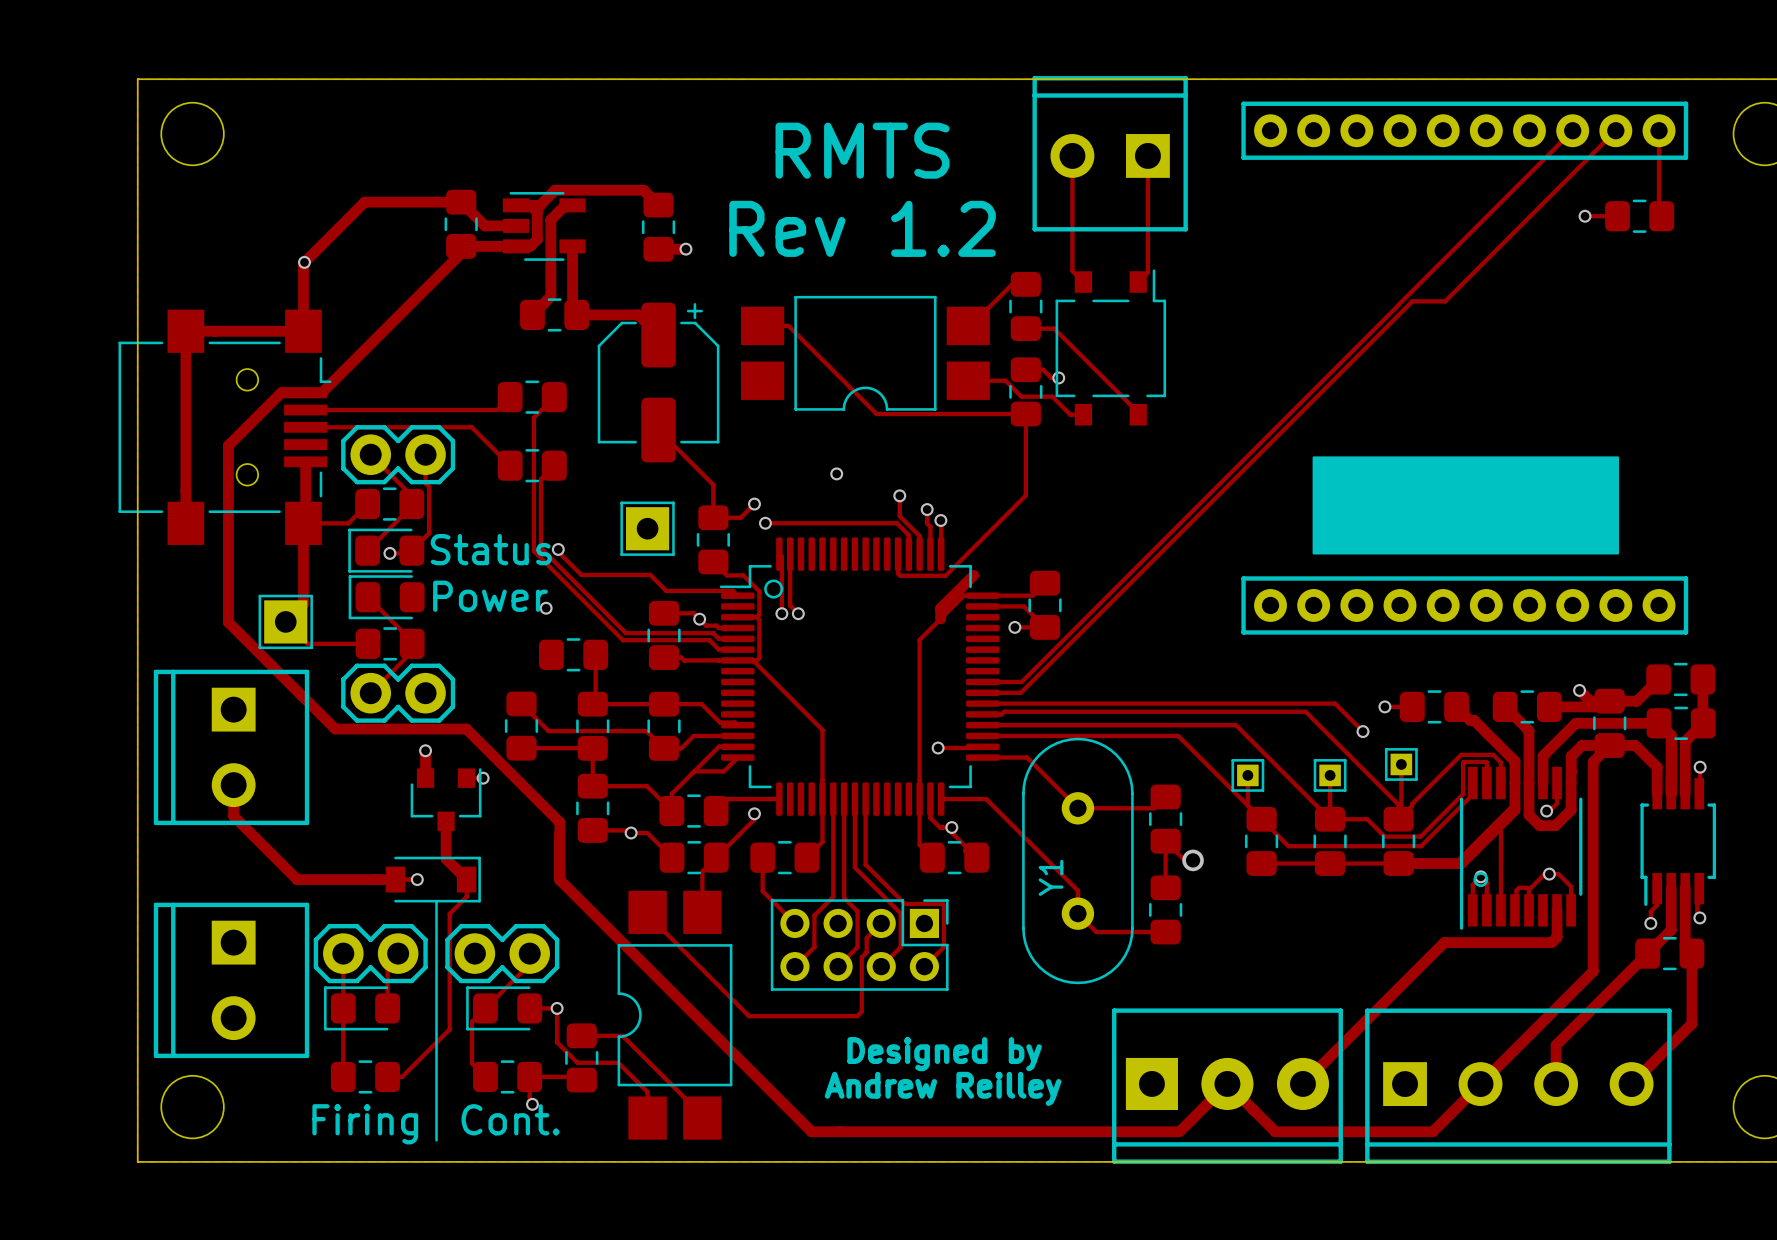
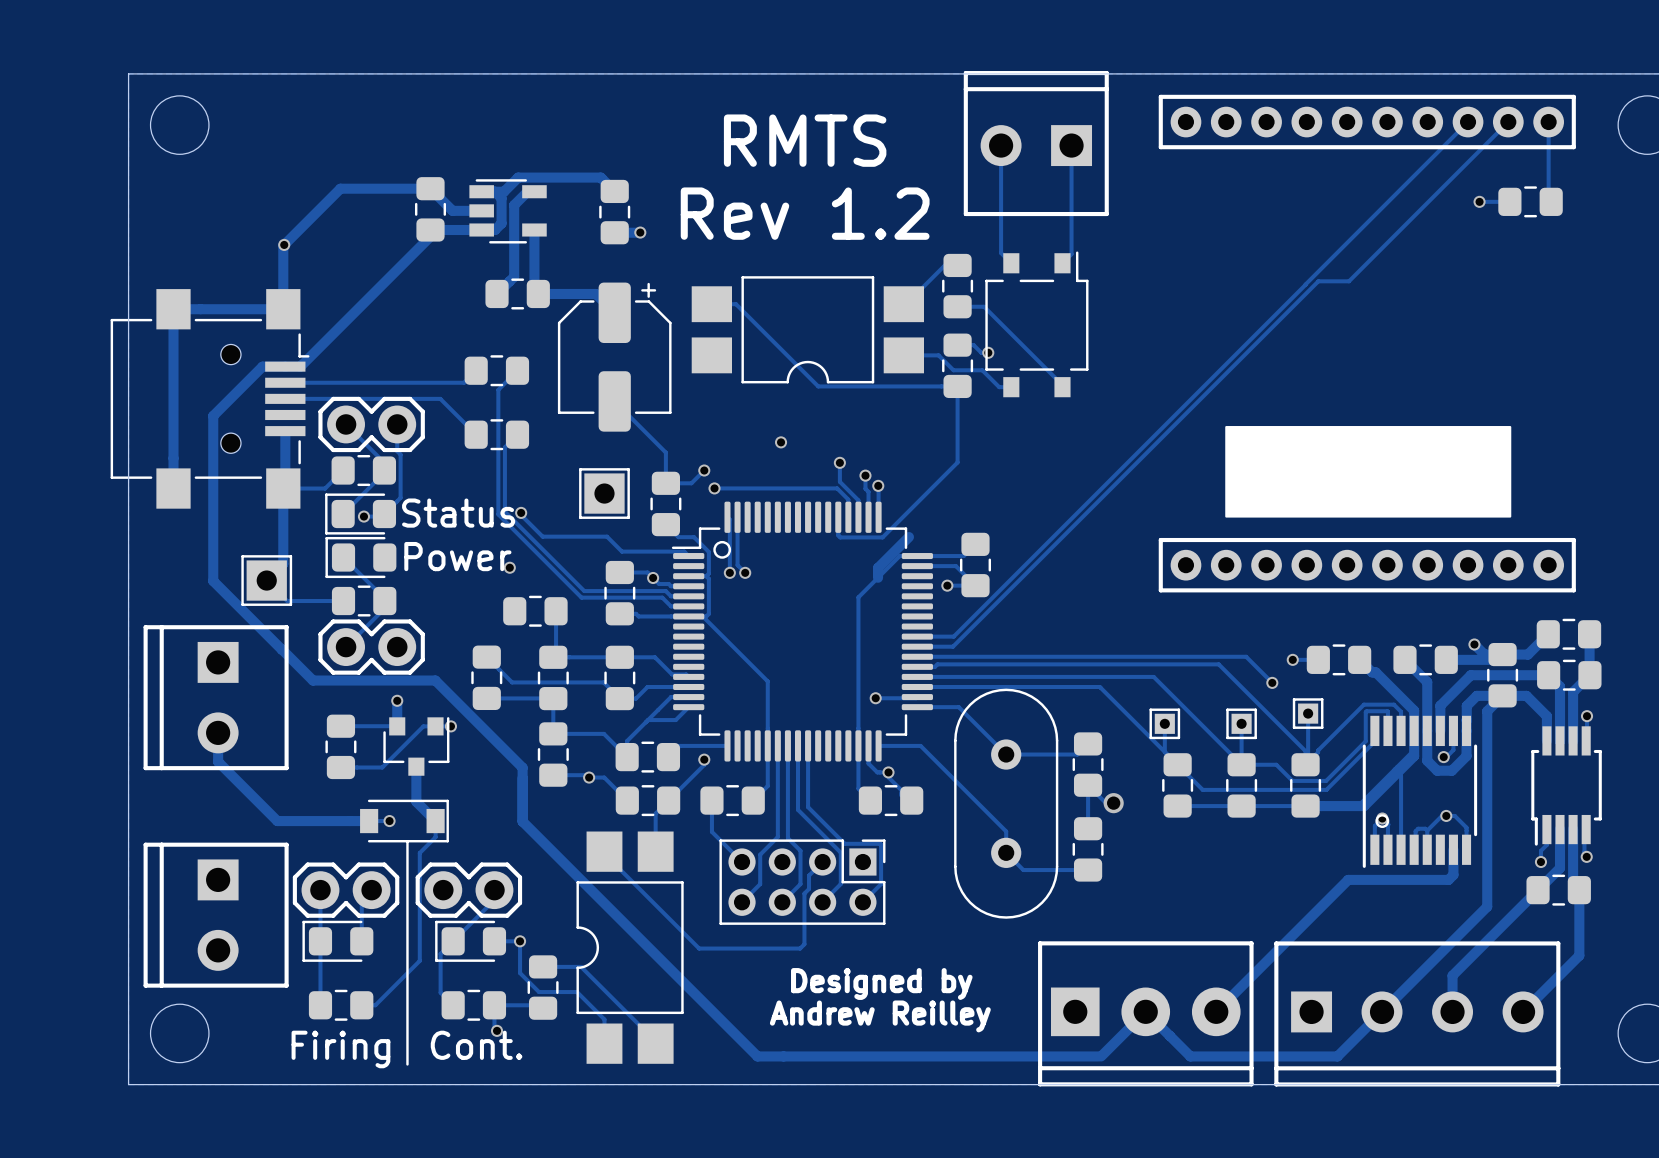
track: none -> (340, 726) (397, 726)
track: none -> (435, 726) (423, 726) (382, 767) (340, 767)
part: none -> (340, 746)
Y1 name: Y1 (1051, 877) -> none

